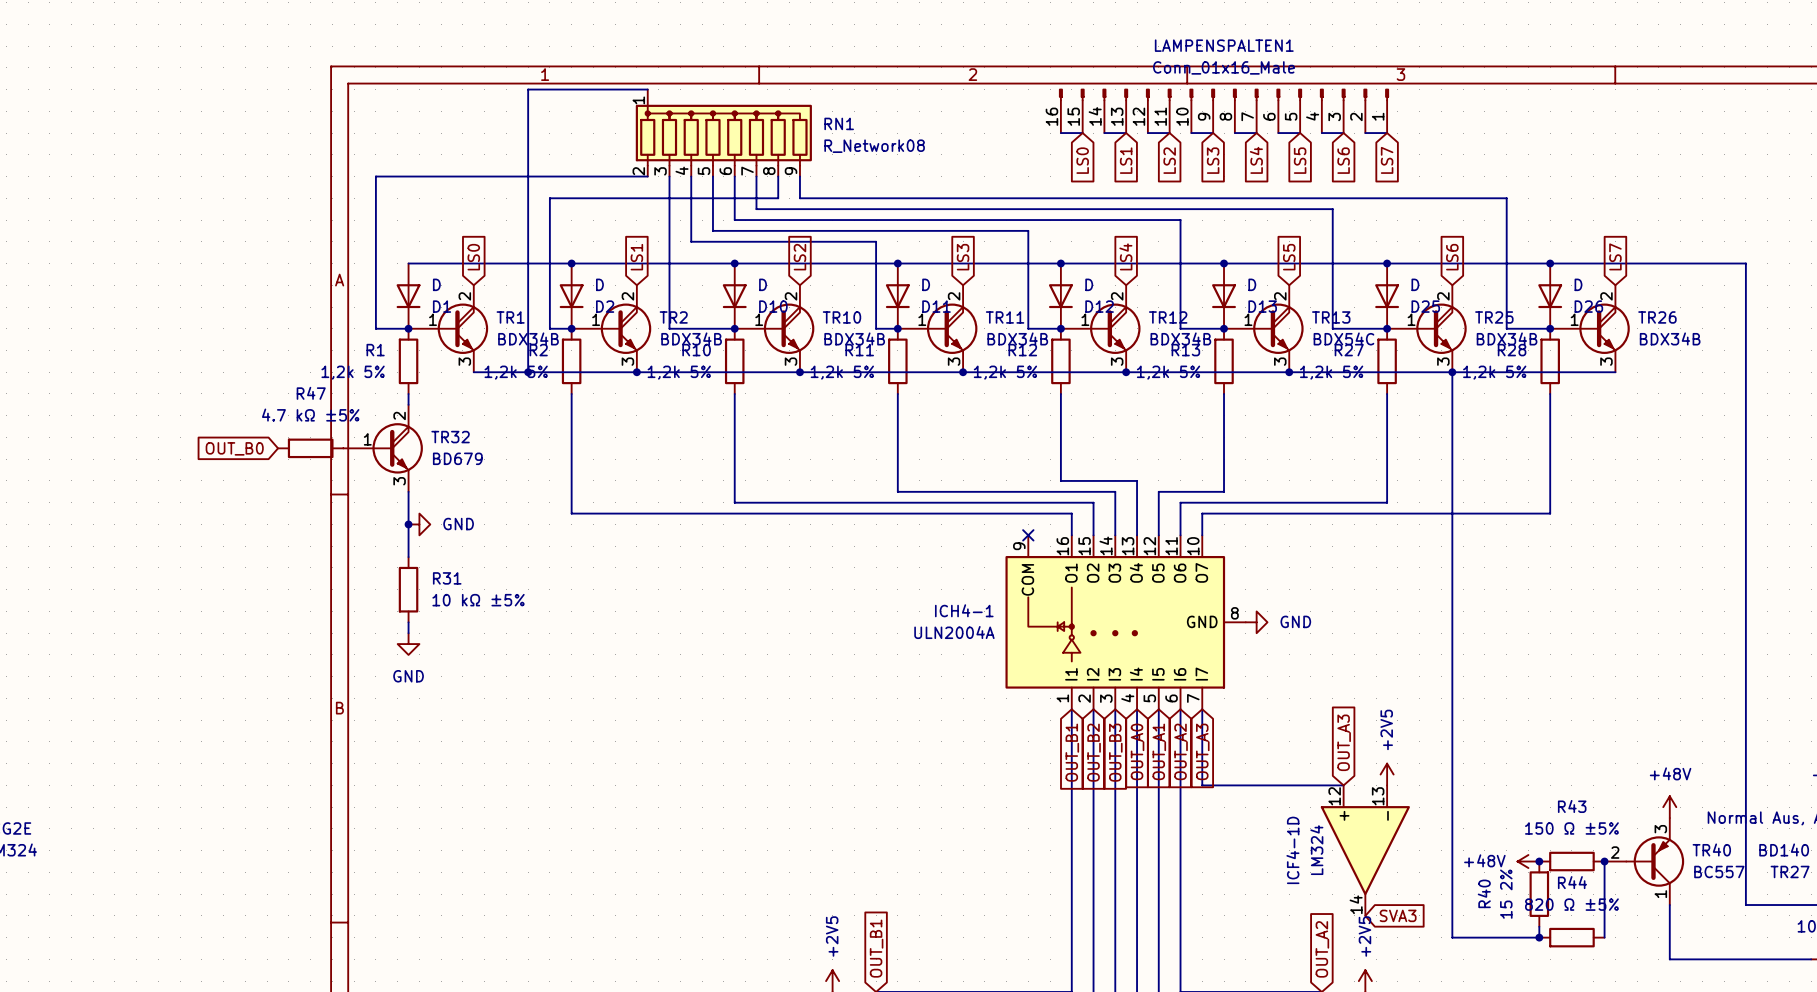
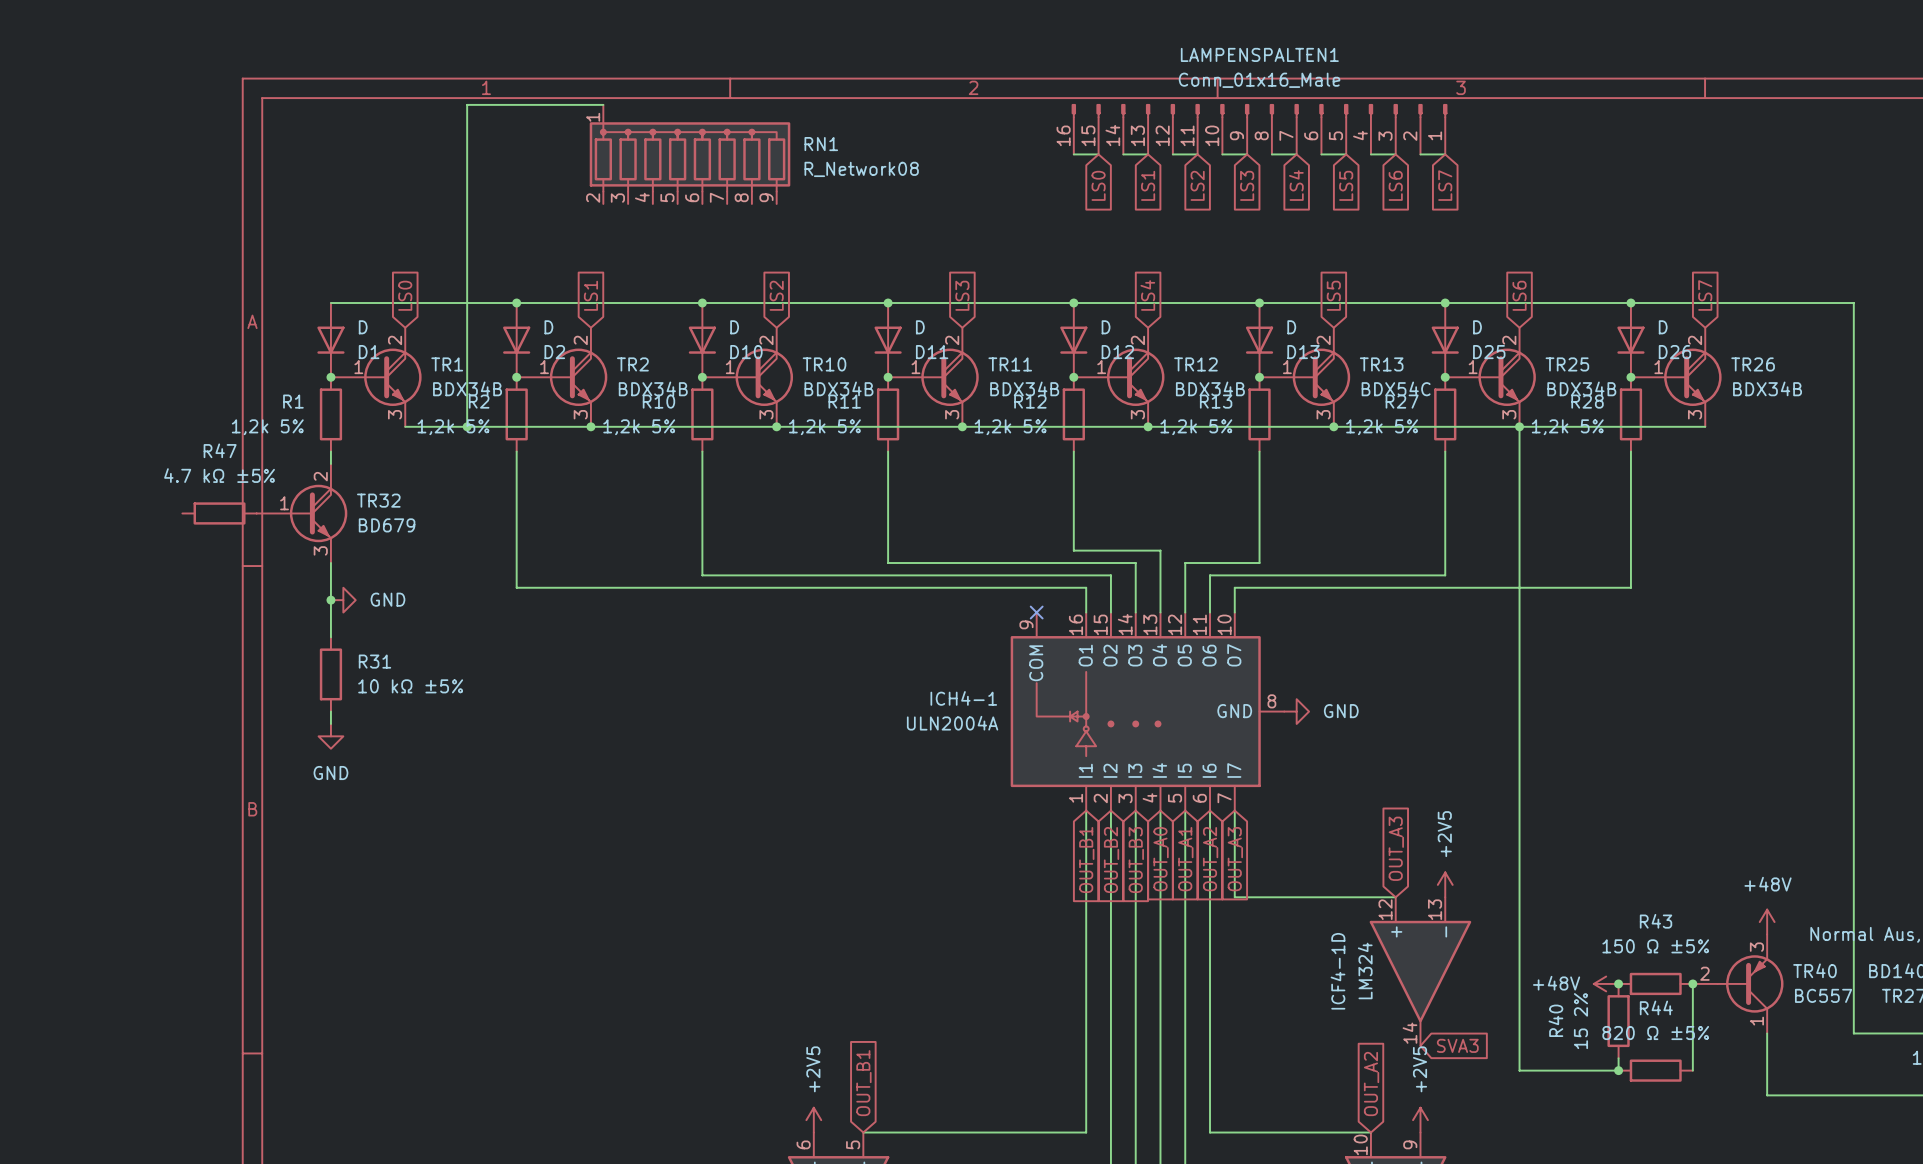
wire: (647, 176) (375, 176) (375, 328) (408, 328) -> none
wire: (669, 176) (669, 328) (734, 328) -> none
wire: (691, 176) (691, 241) (876, 241) (876, 328) (897, 328) -> none
wire: (712, 176) (712, 230) (1028, 230) (1028, 328) (1060, 328) -> none
wire: (734, 176) (734, 220) (1180, 220) (1180, 328) (1224, 328) -> none
wire: (756, 176) (756, 209) (1332, 209) (1332, 328) (1387, 328) -> none
wire: (778, 176) (778, 198) (549, 198) (549, 328) (571, 328) -> none
wire: (799, 176) (799, 198) (1506, 198) (1506, 328) (1550, 328) -> none
global label: OUT_B0 (234, 448) -> none

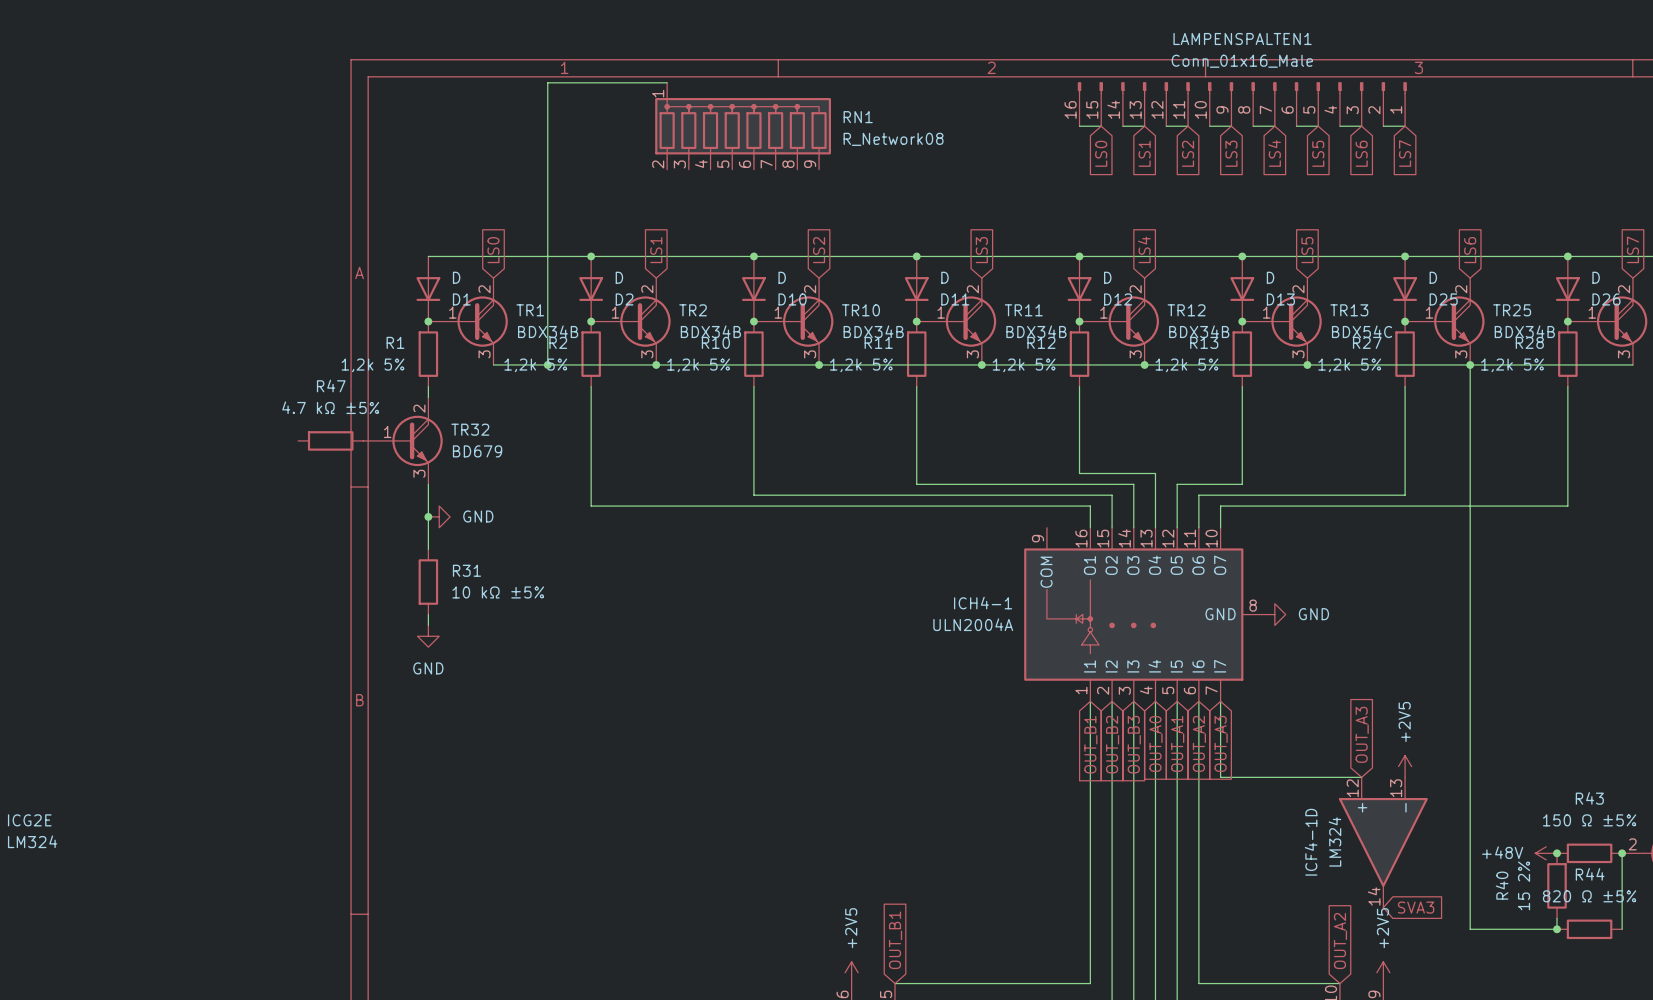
no-connect mark: (1036, 612) -> none

